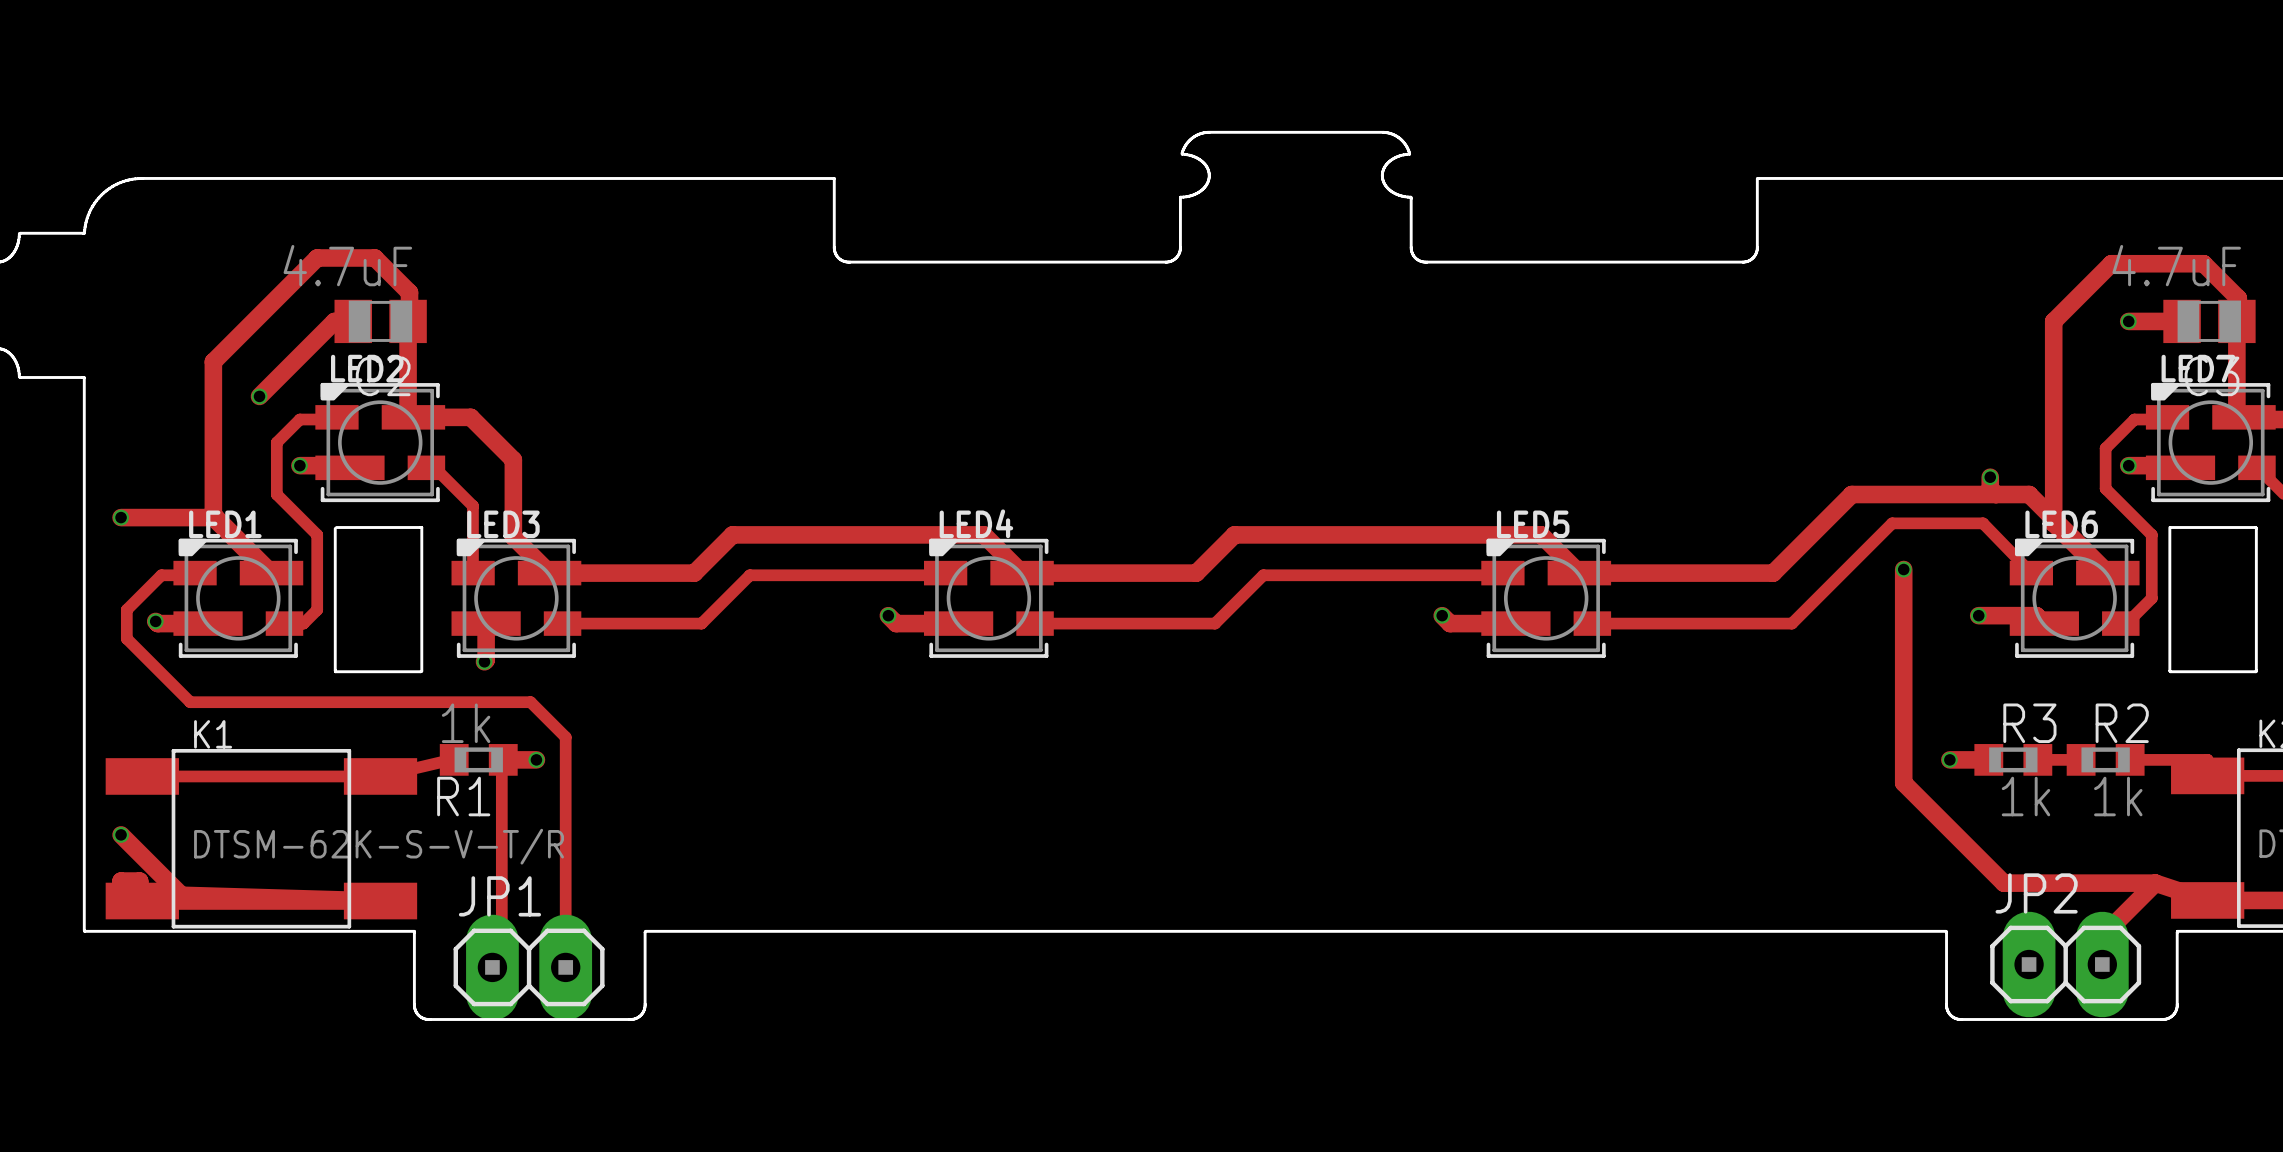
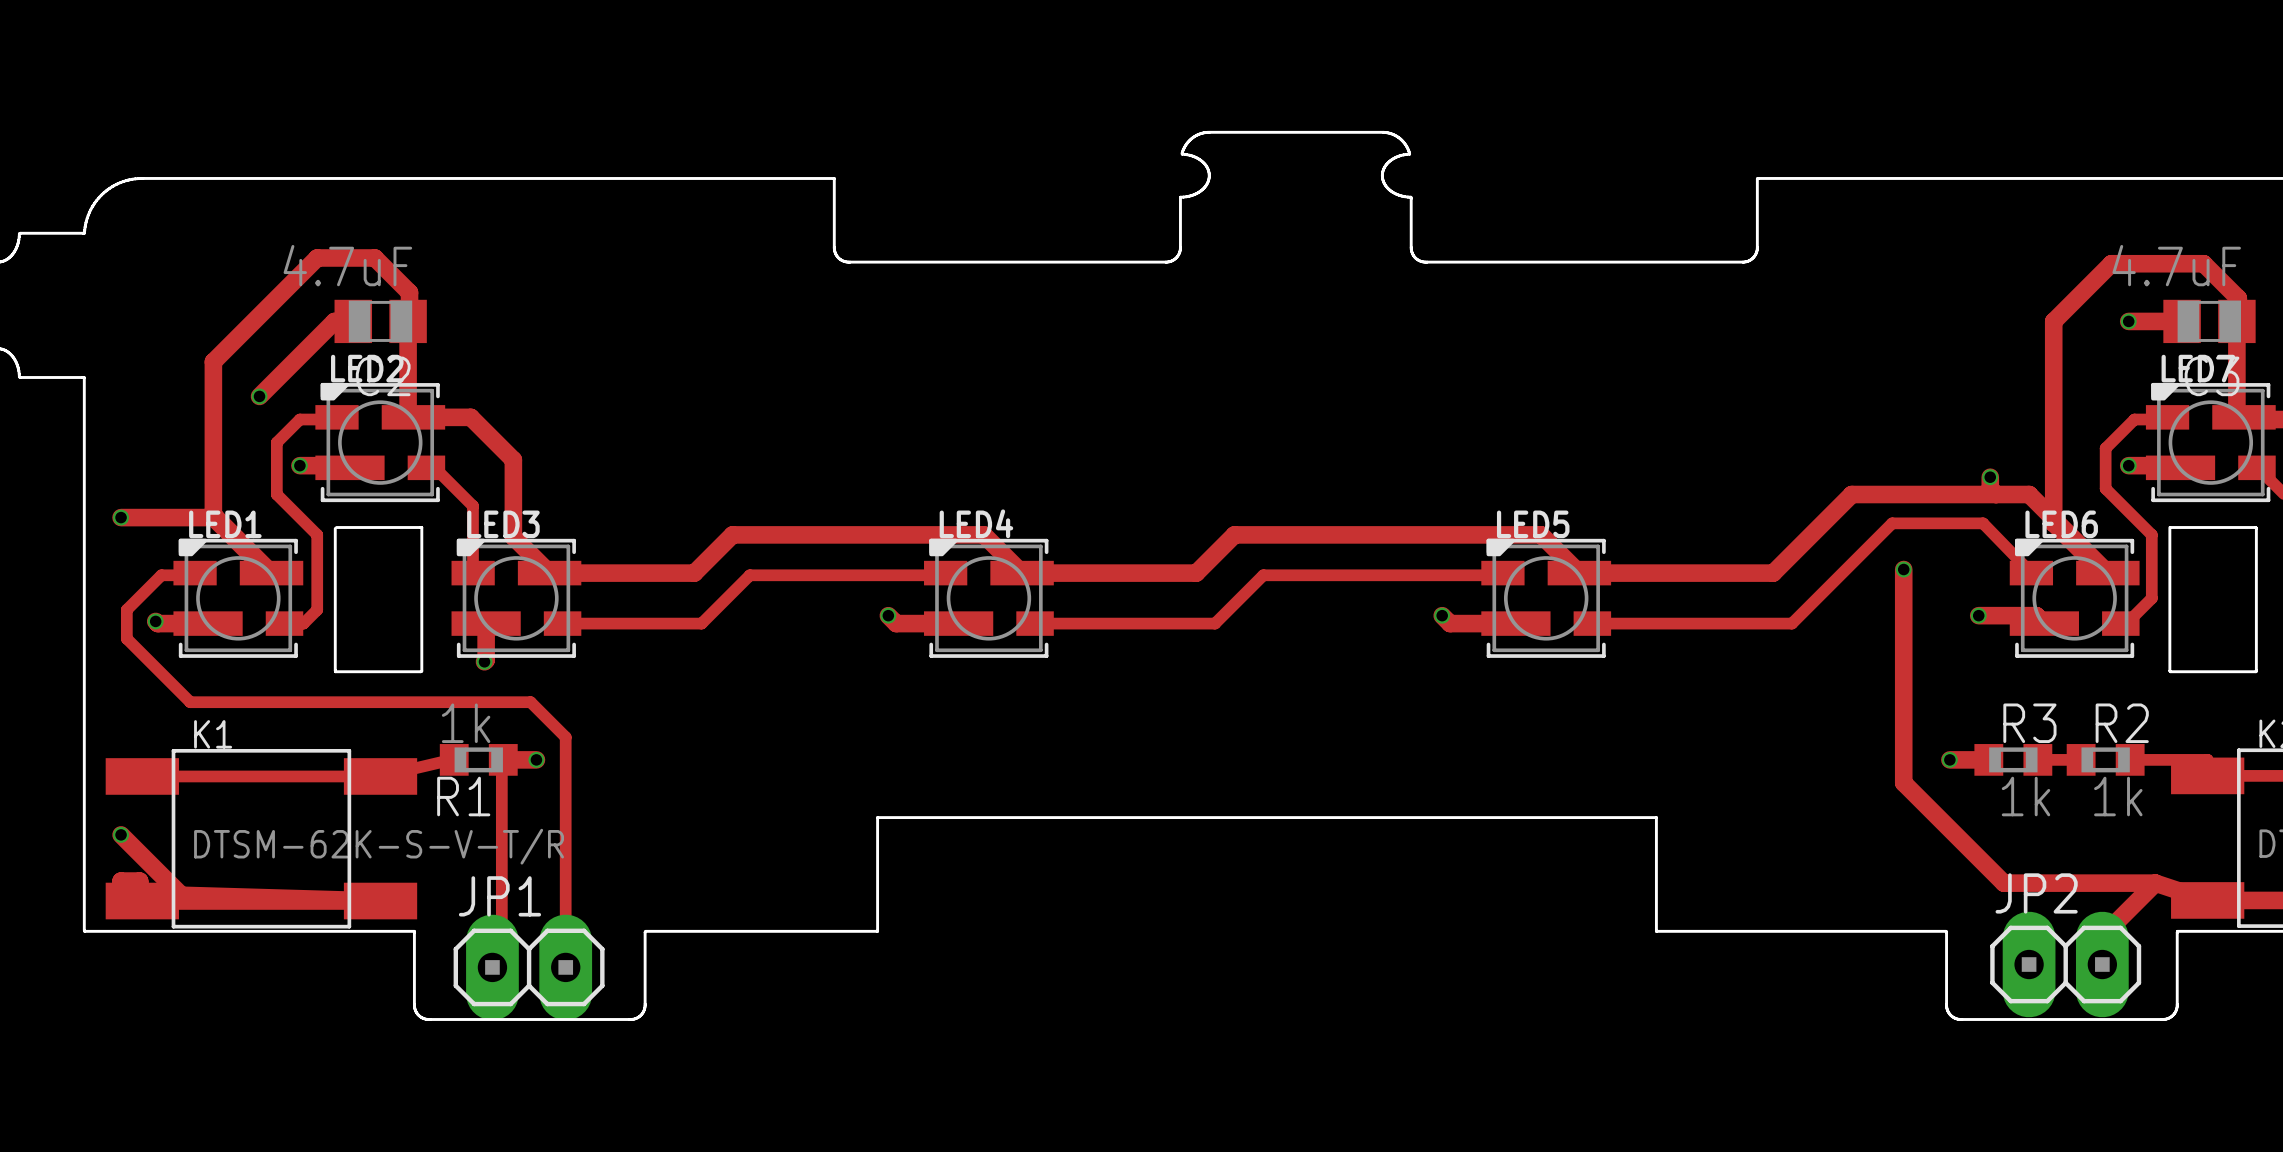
board edge: (877, 931) (1656, 931) -> (877, 931) (877, 817) (1656, 817) (1656, 931)

